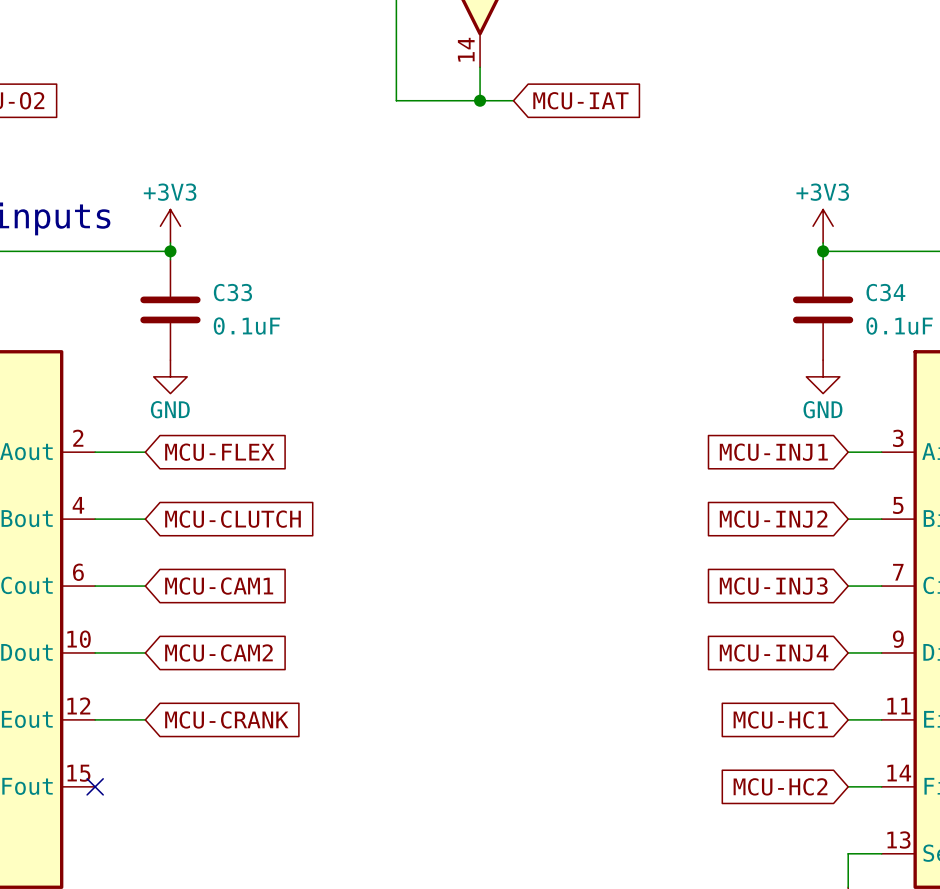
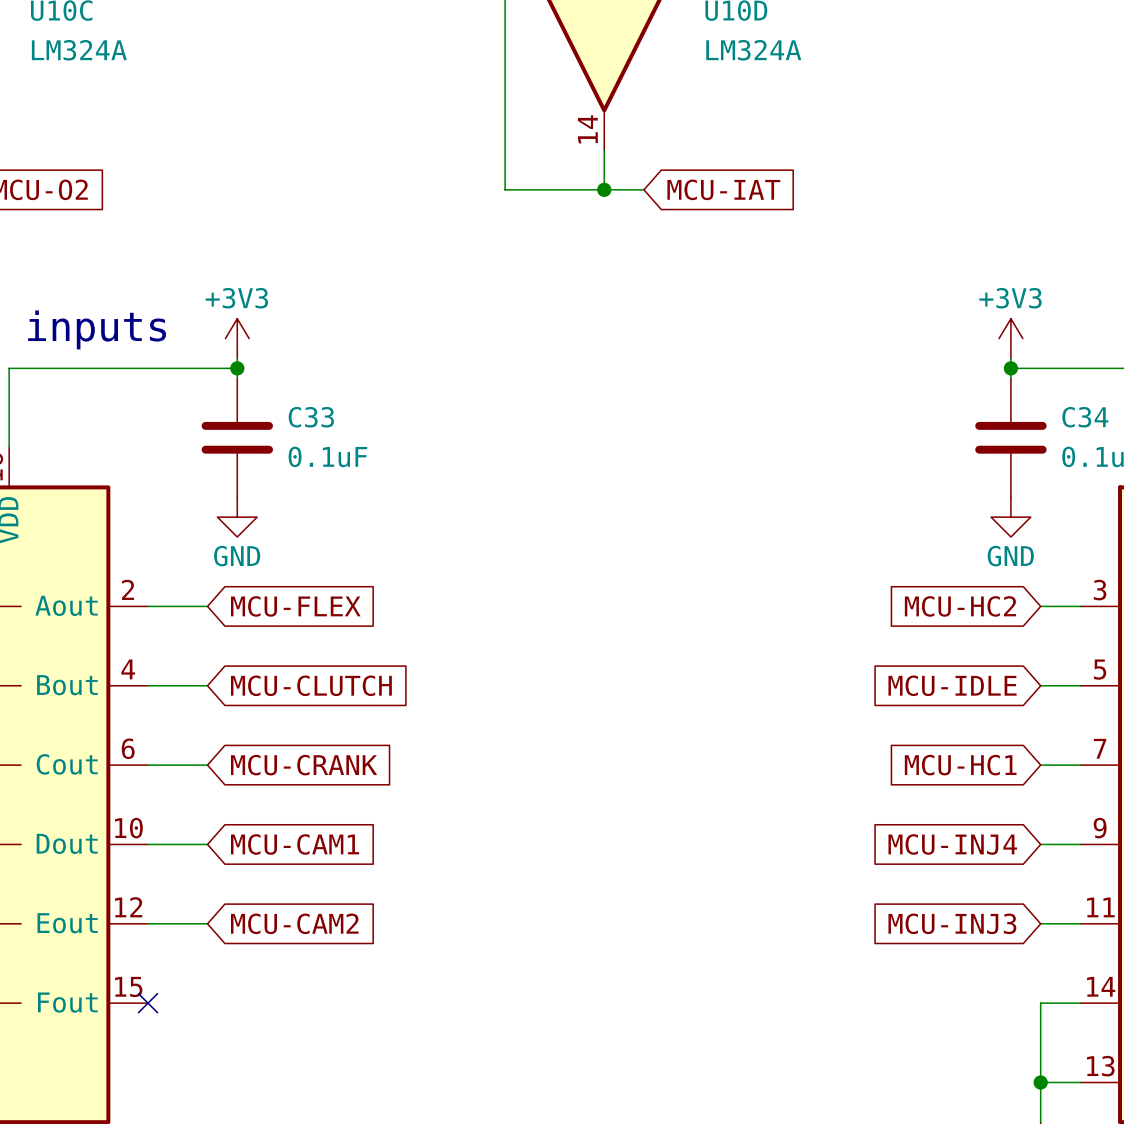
global label: MCU-INJ1 (773, 452) -> MCU-HC2 (960, 606)
global label: MCU-INJ2 (773, 519) -> MCU-IDLE (952, 685)
global label: MCU-CAM1 (219, 586) -> MCU-CRANK (304, 765)
global label: MCU-INJ3 (773, 586) -> MCU-HC1 (960, 765)
global label: MCU-CAM2 (218, 652) -> MCU-CAM1 (295, 844)
global label: MCU-CRANK (226, 719) -> MCU-CAM2 (294, 923)
global label: MCU-HC1 (780, 719) -> MCU-INJ3 (952, 923)
global label: MCU-HC2 (780, 786) -> none
wire: none -> (1040, 1003) (1040, 1082)
junction: none -> (1040, 1082)

